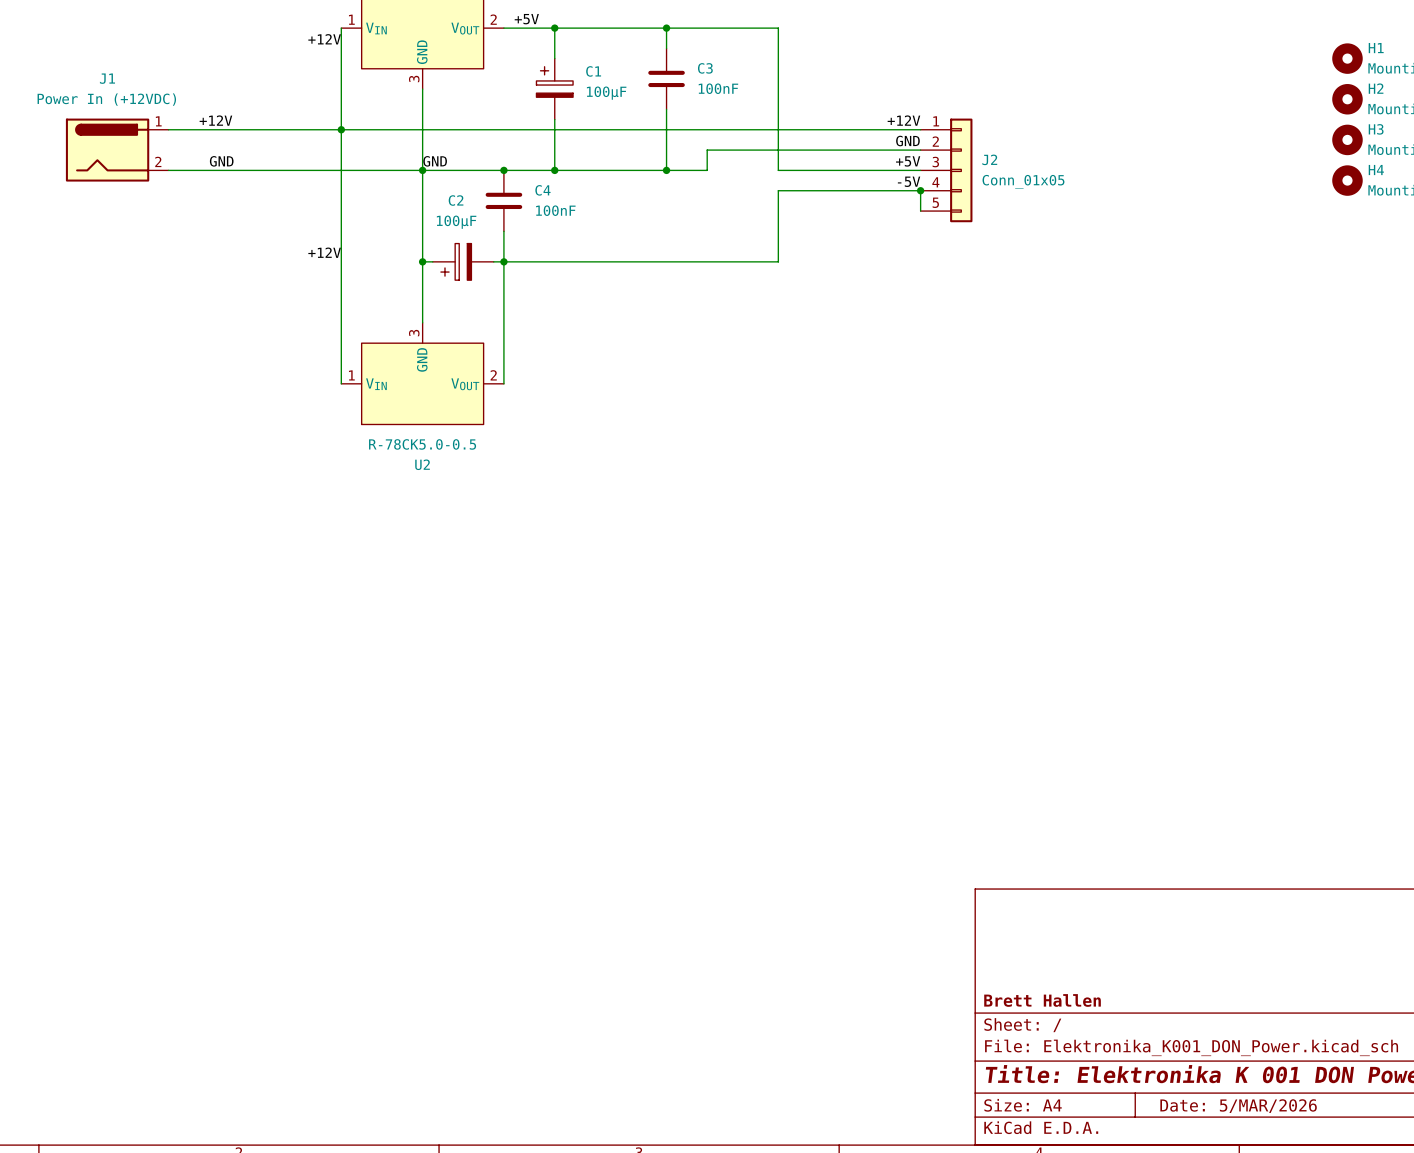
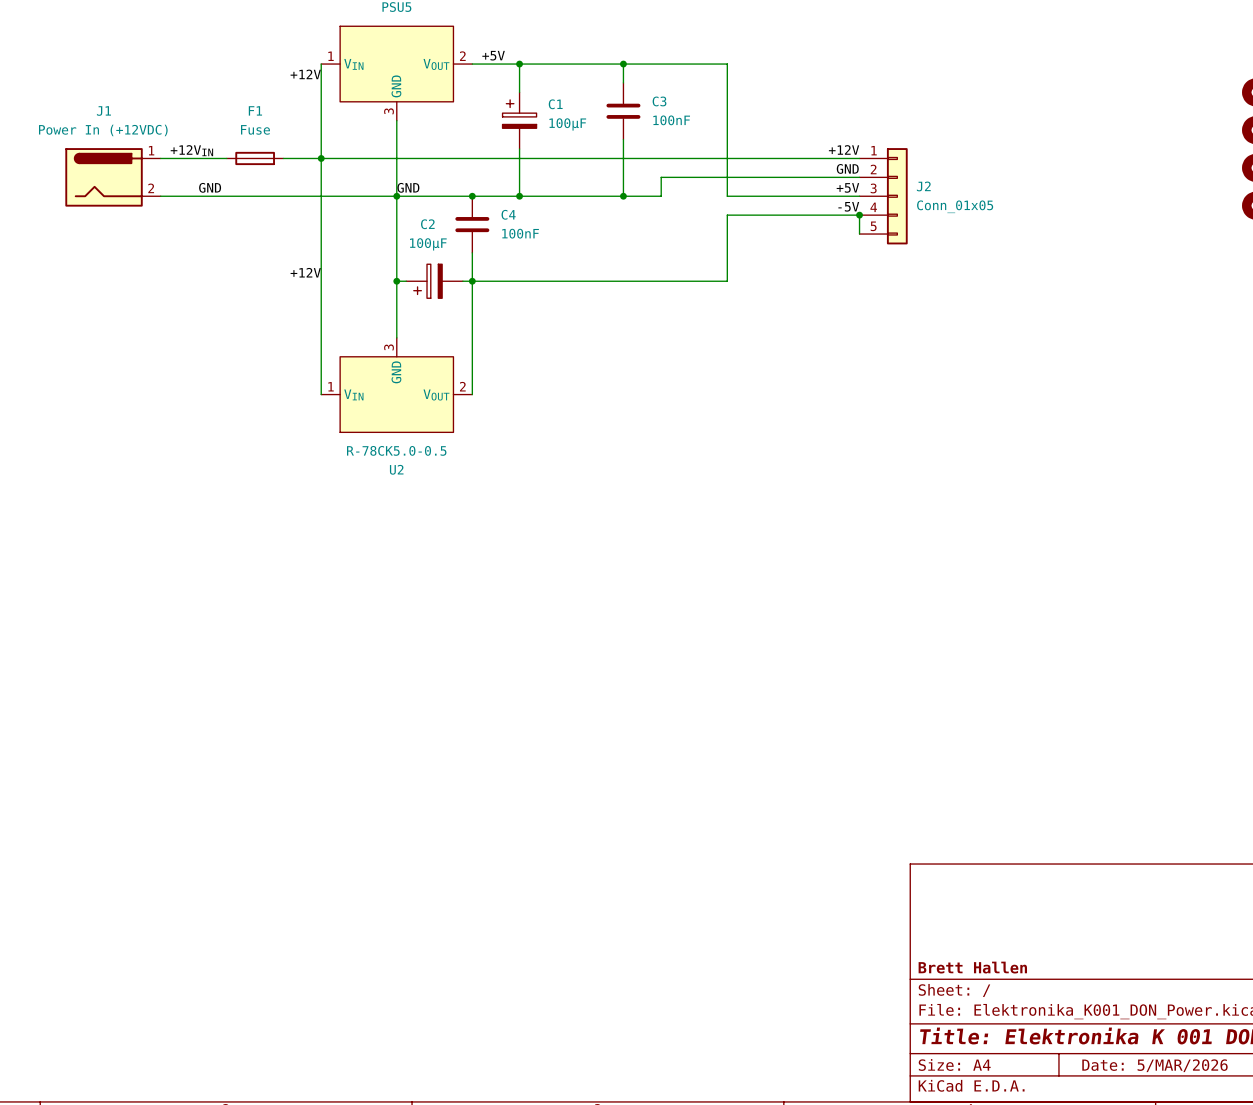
label: +12V (215, 120) -> +12VIN (191, 150)
F1: none -> Fuse (255, 158)

